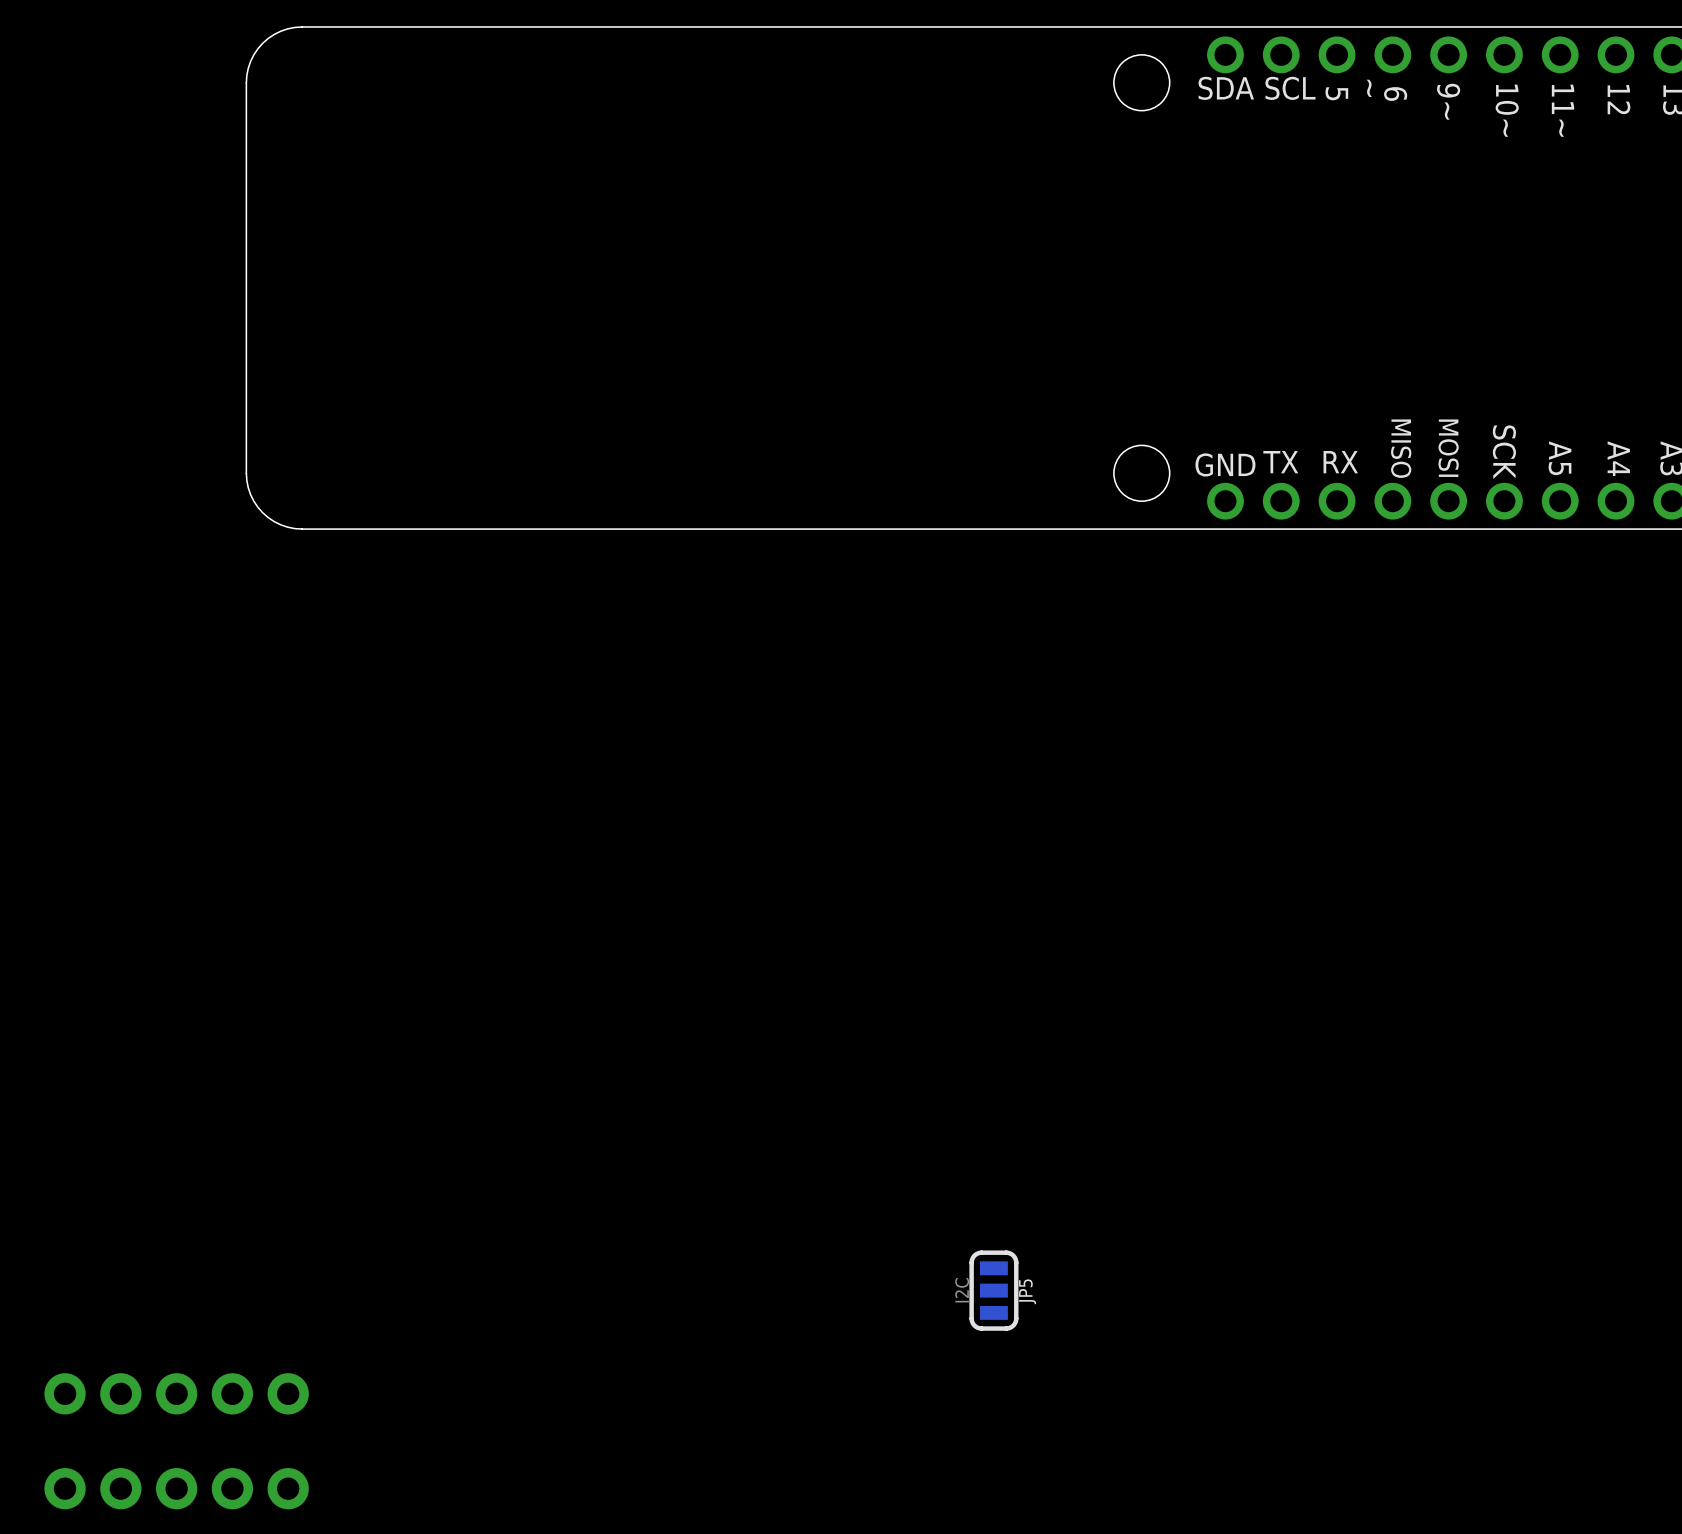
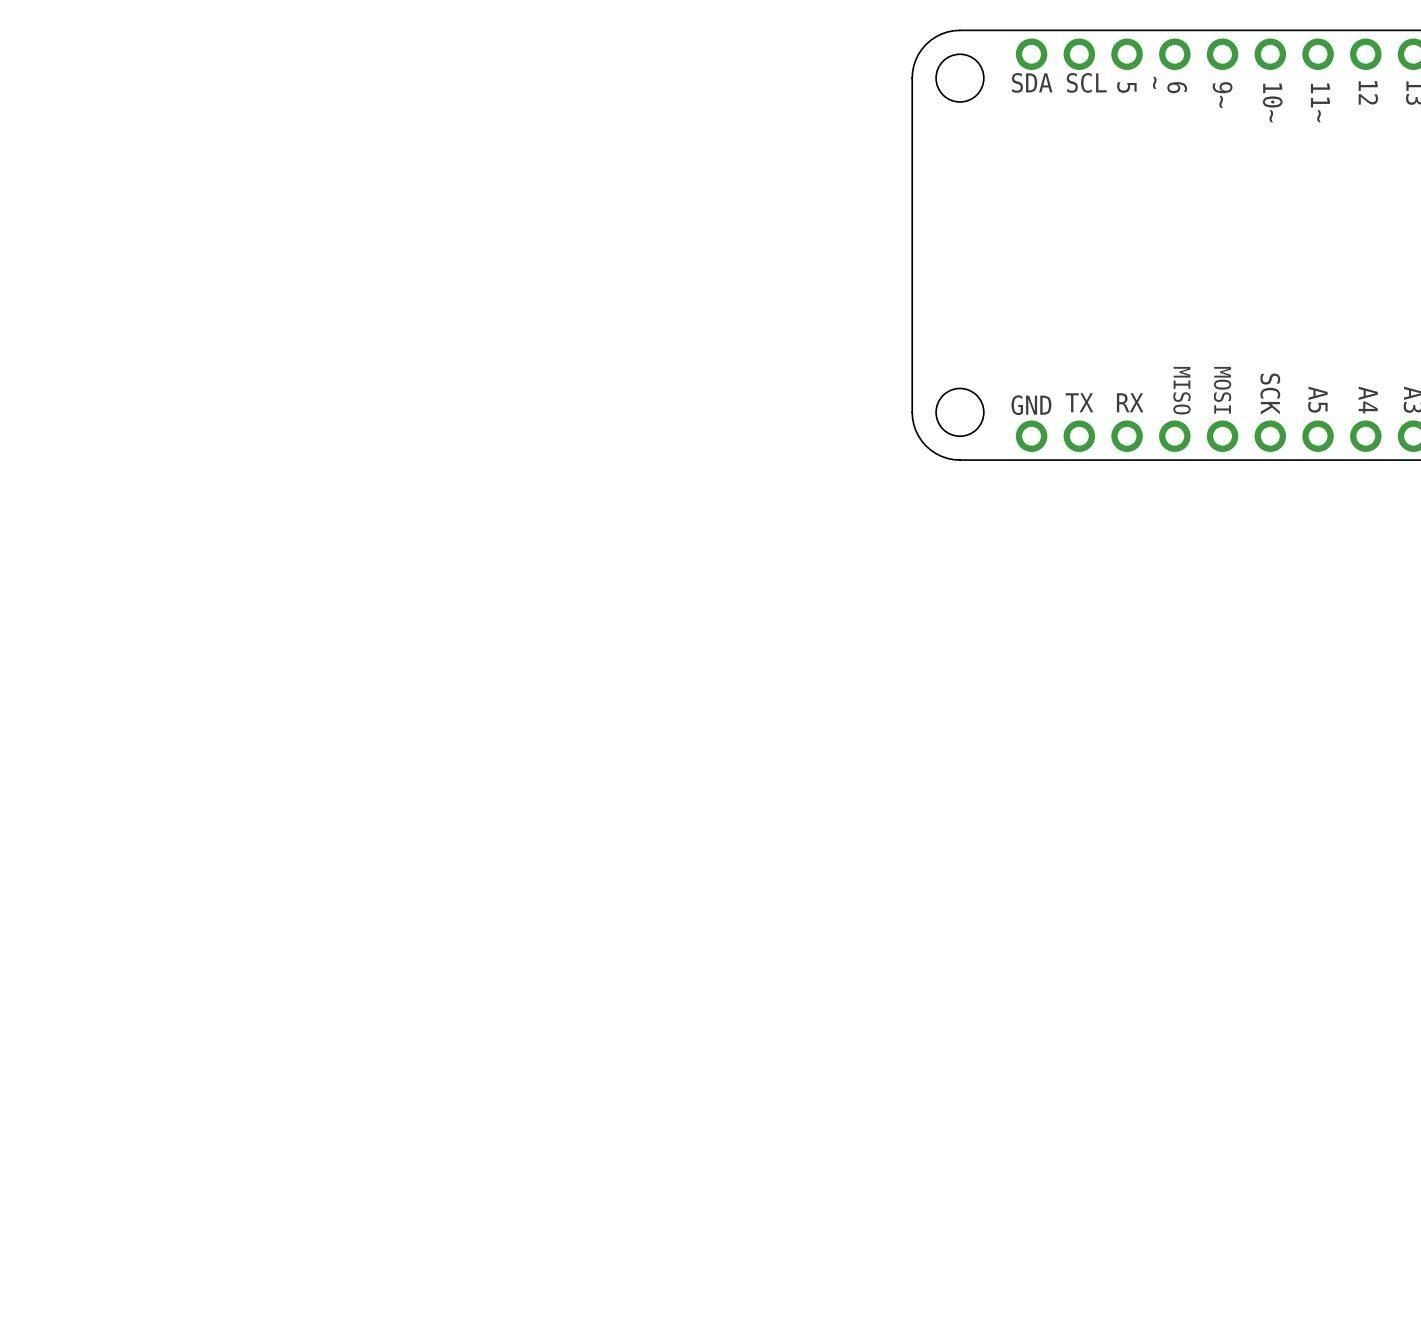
board edge: (1141, 26) (302, 26) (280, 31) (262, 43) (250, 61) (246, 82) (246, 473) (248, 487) (253, 501) (262, 512) (274, 521) (287, 527) (302, 529) (1141, 529) -> (959, 30) (941, 34) (926, 44) (915, 59) (912, 78) (912, 418) (915, 430) (926, 446) (941, 456) (959, 460)
JP5: I2C (993, 1290) -> none
part: (176, 1393) -> none
part: (176, 1488) -> none

